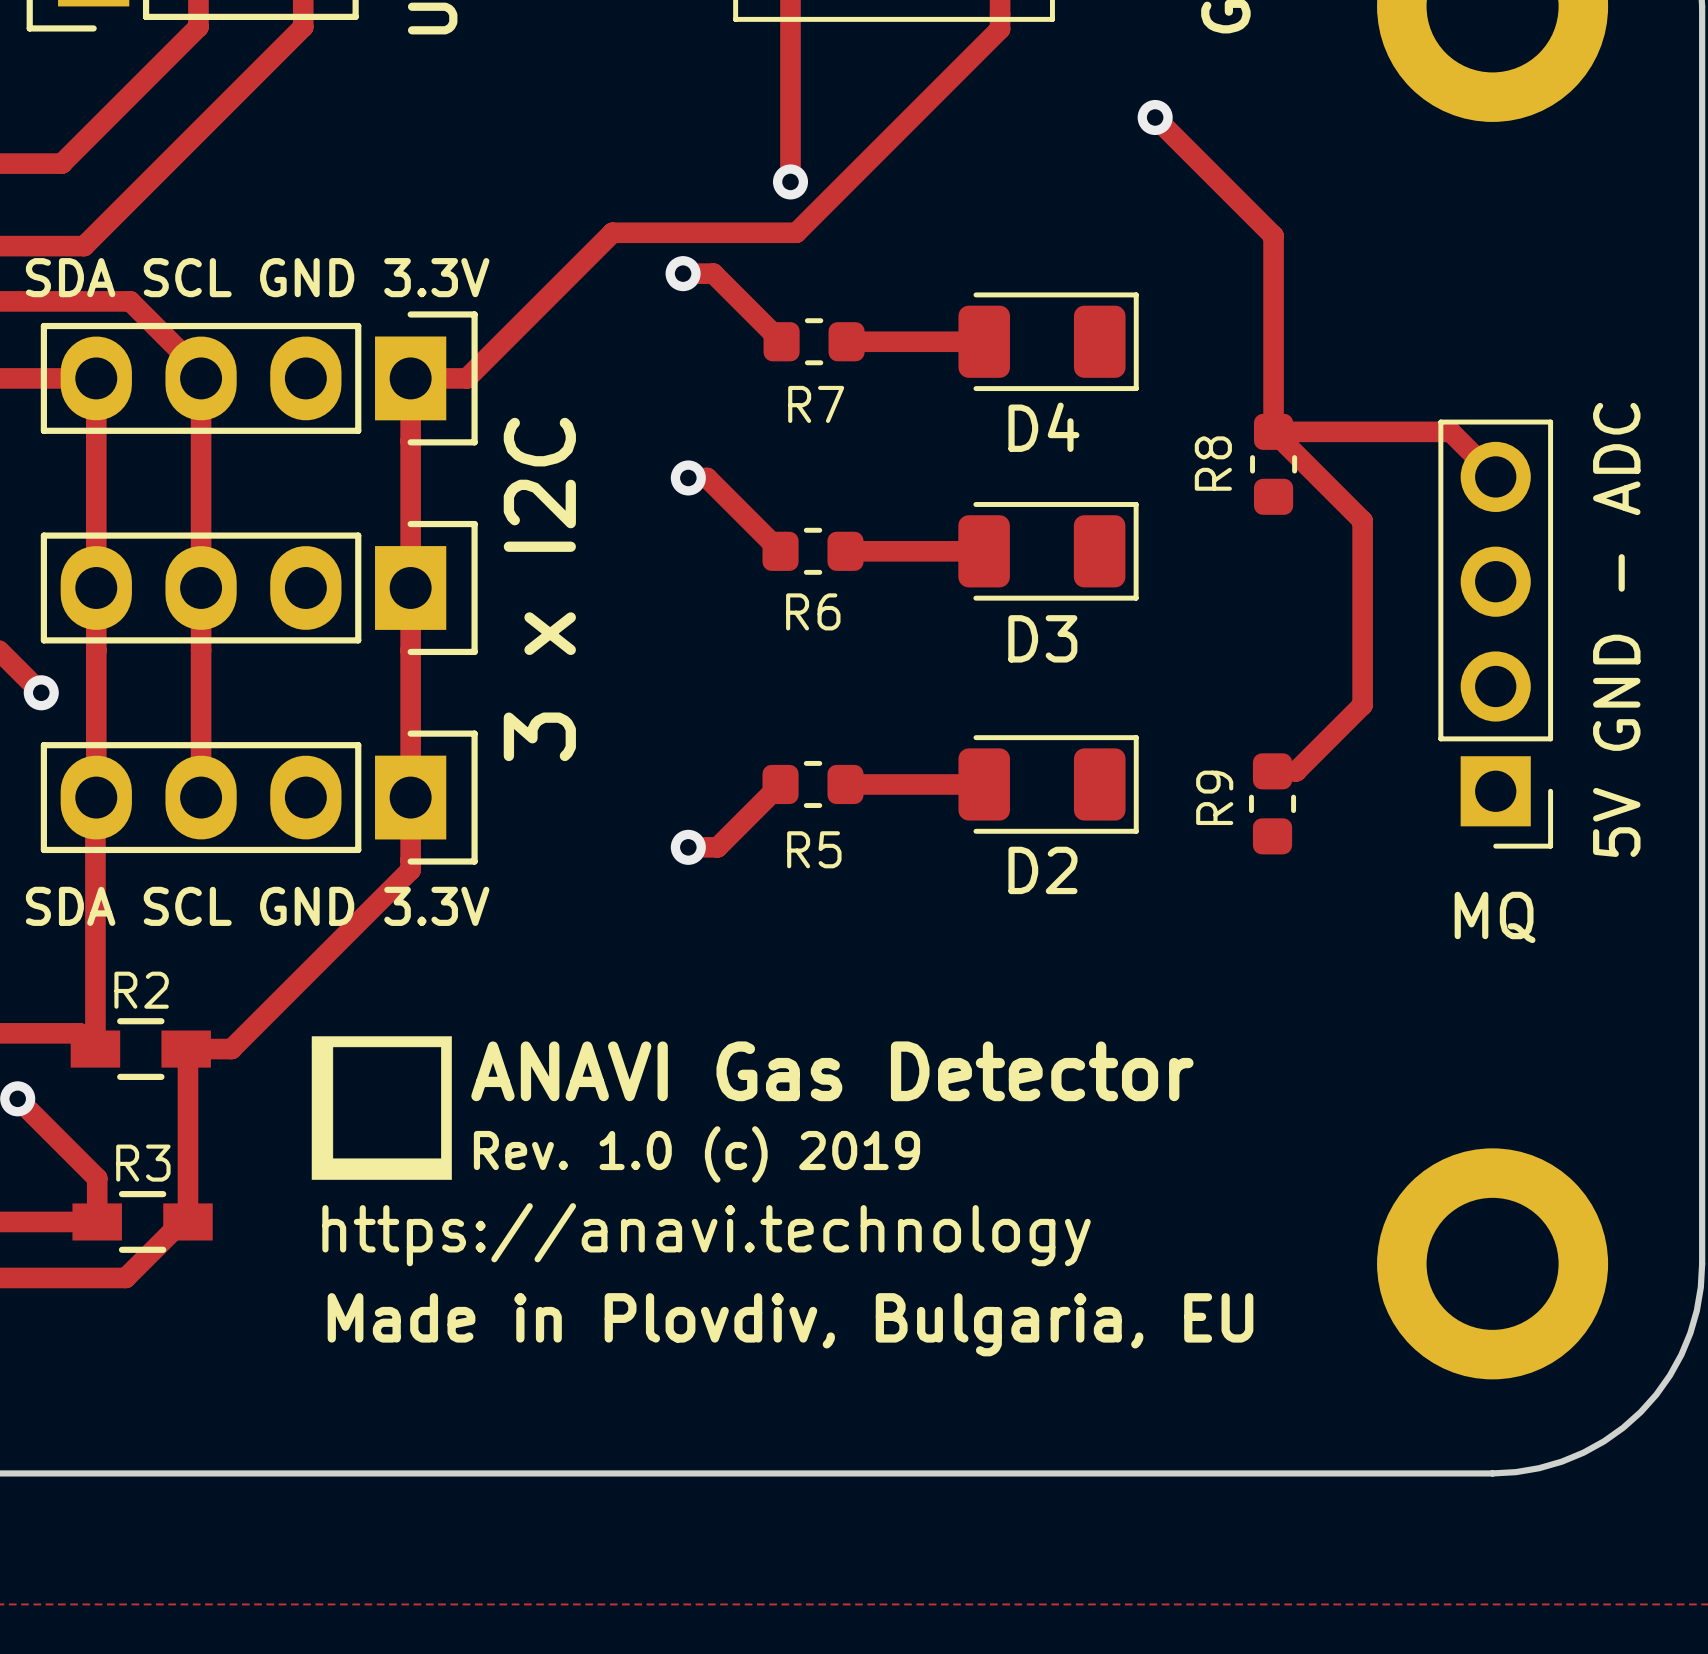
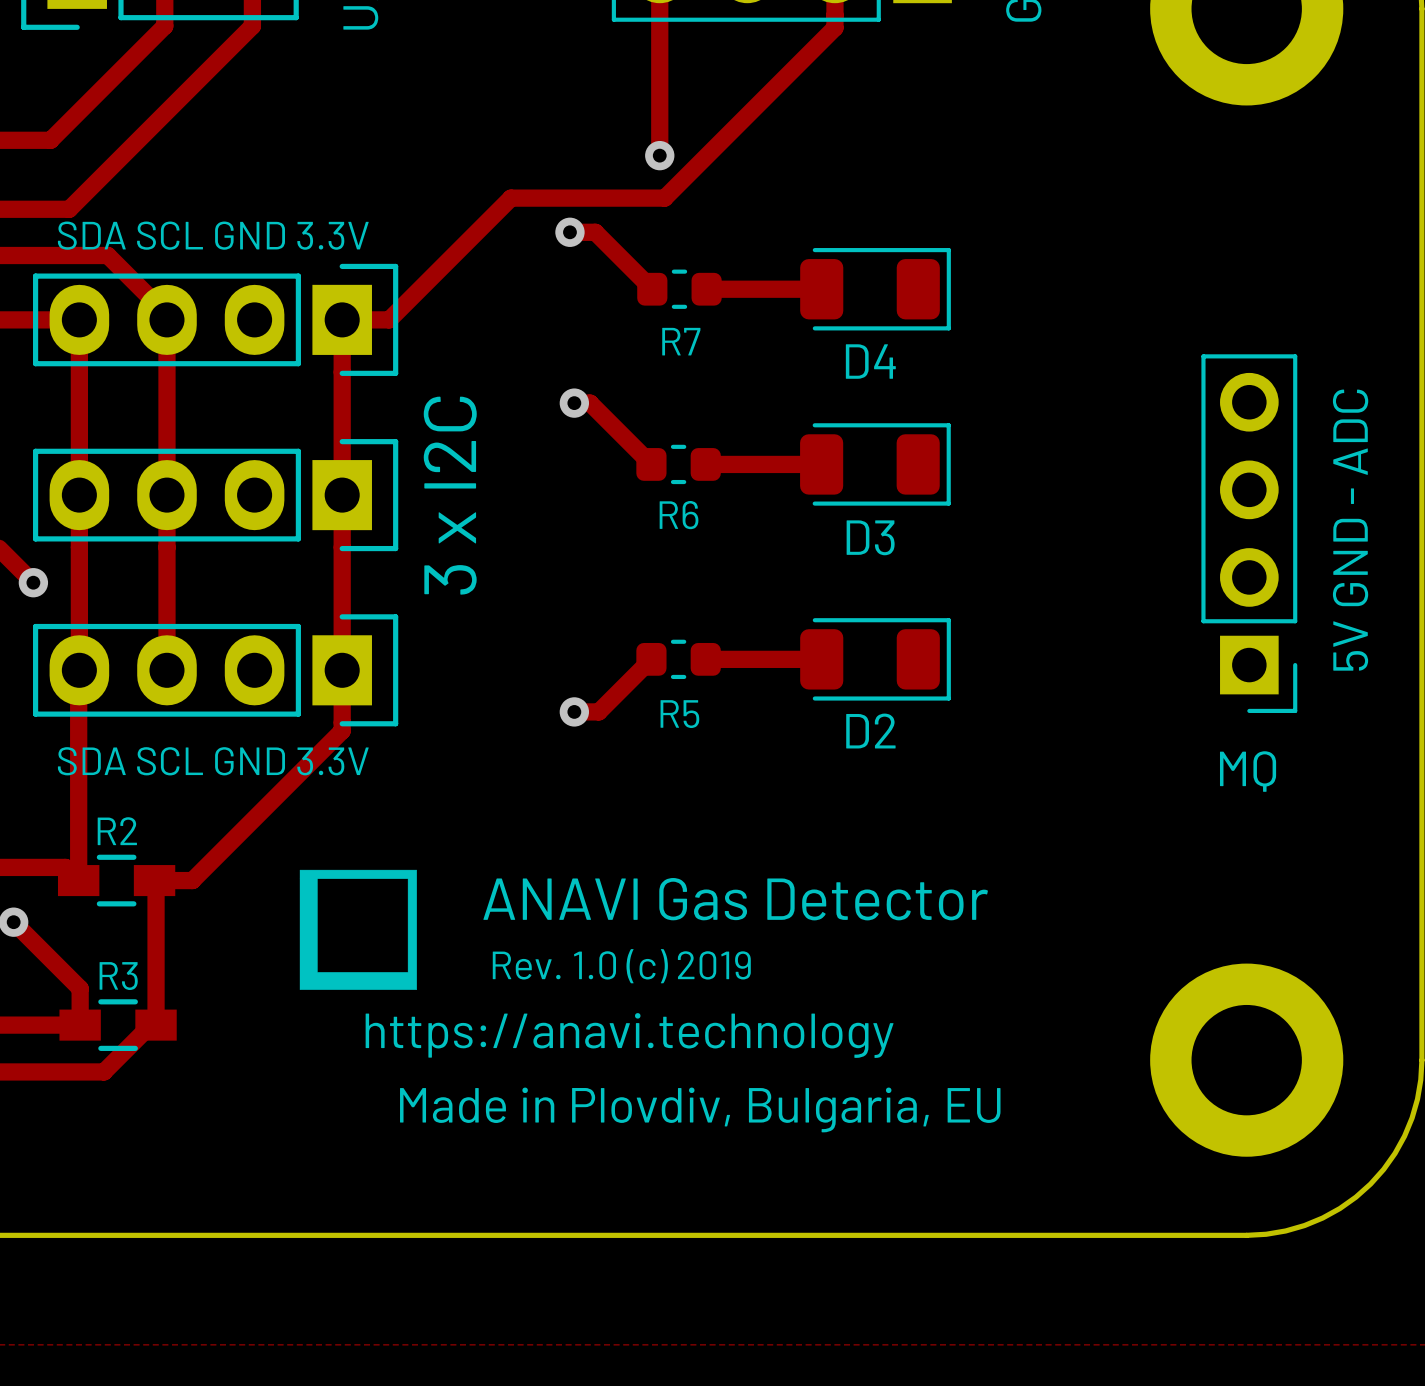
track: (1155, 117) (1273, 235) (1273, 431) -> none
via: (1155, 117) -> none
track: (1273, 431) (1450, 431) (1495, 476) -> none
track: (1273, 431) (1362, 520) (1362, 704) (1296, 771) (1272, 771) -> none
R8: (1273, 464) -> none
R9: (1272, 803) -> none
text position: ANAVI Gas Detector (832, 1071) -> ANAVI Gas Detector (735, 899)
drawing position: (381, 1108) -> (358, 929)
text position: Rev. 1.0 (c) 2019 (696, 1154) -> Rev. 1.0 (c) 2019 (621, 966)
text position: https://anavi.technology (706, 1234) -> https://anavi.technology (629, 1035)
text position: Made in Plovdiv, Bulgaria, EU (790, 1324) -> Made in Plovdiv, Bulgaria, EU (700, 1109)

